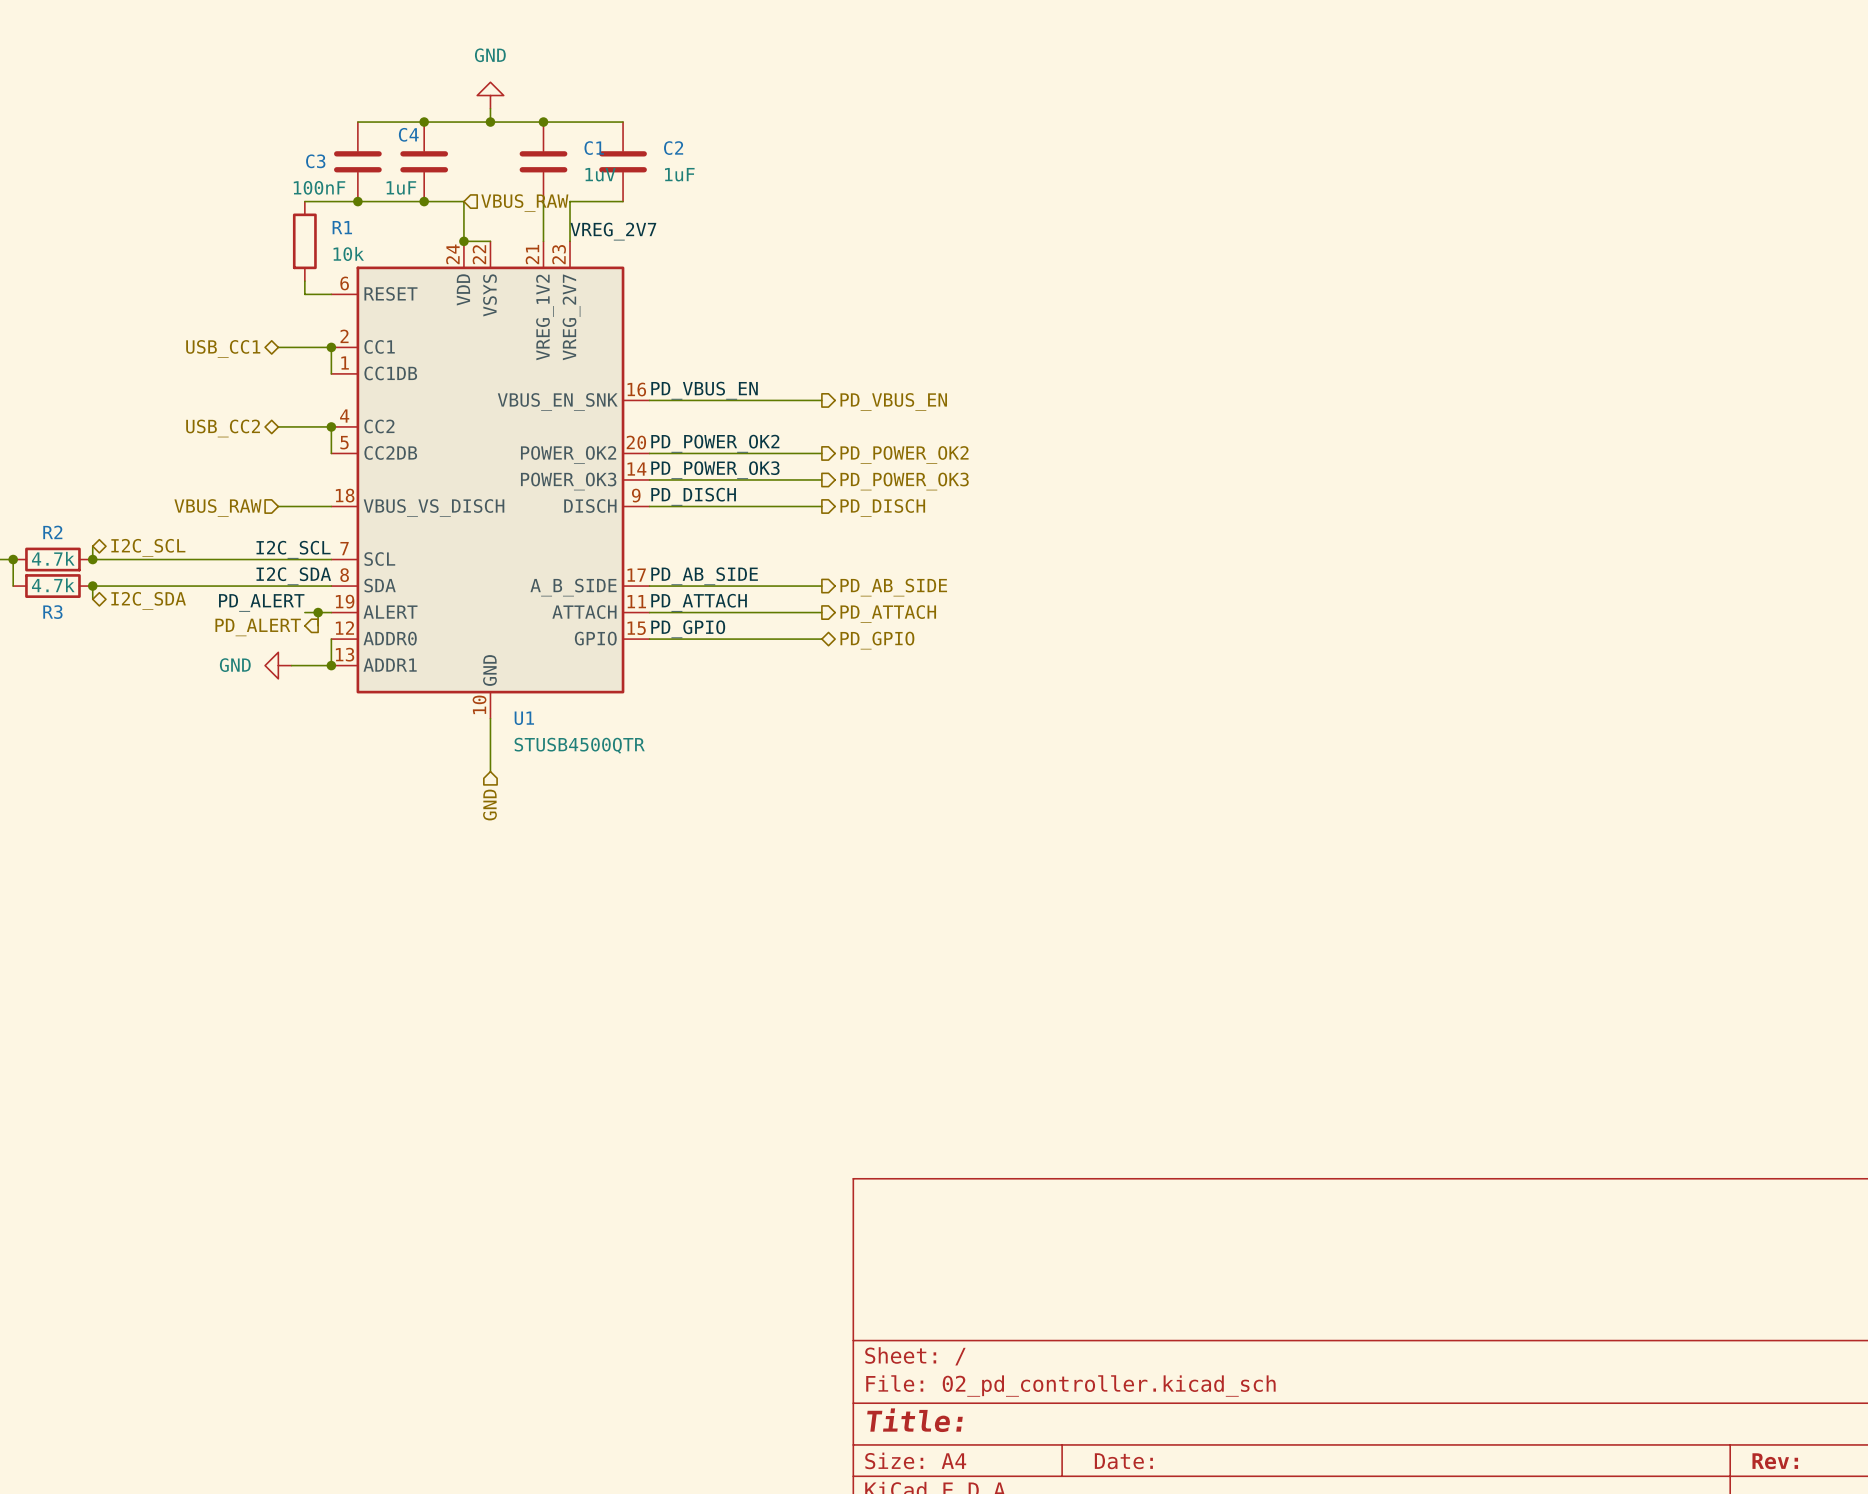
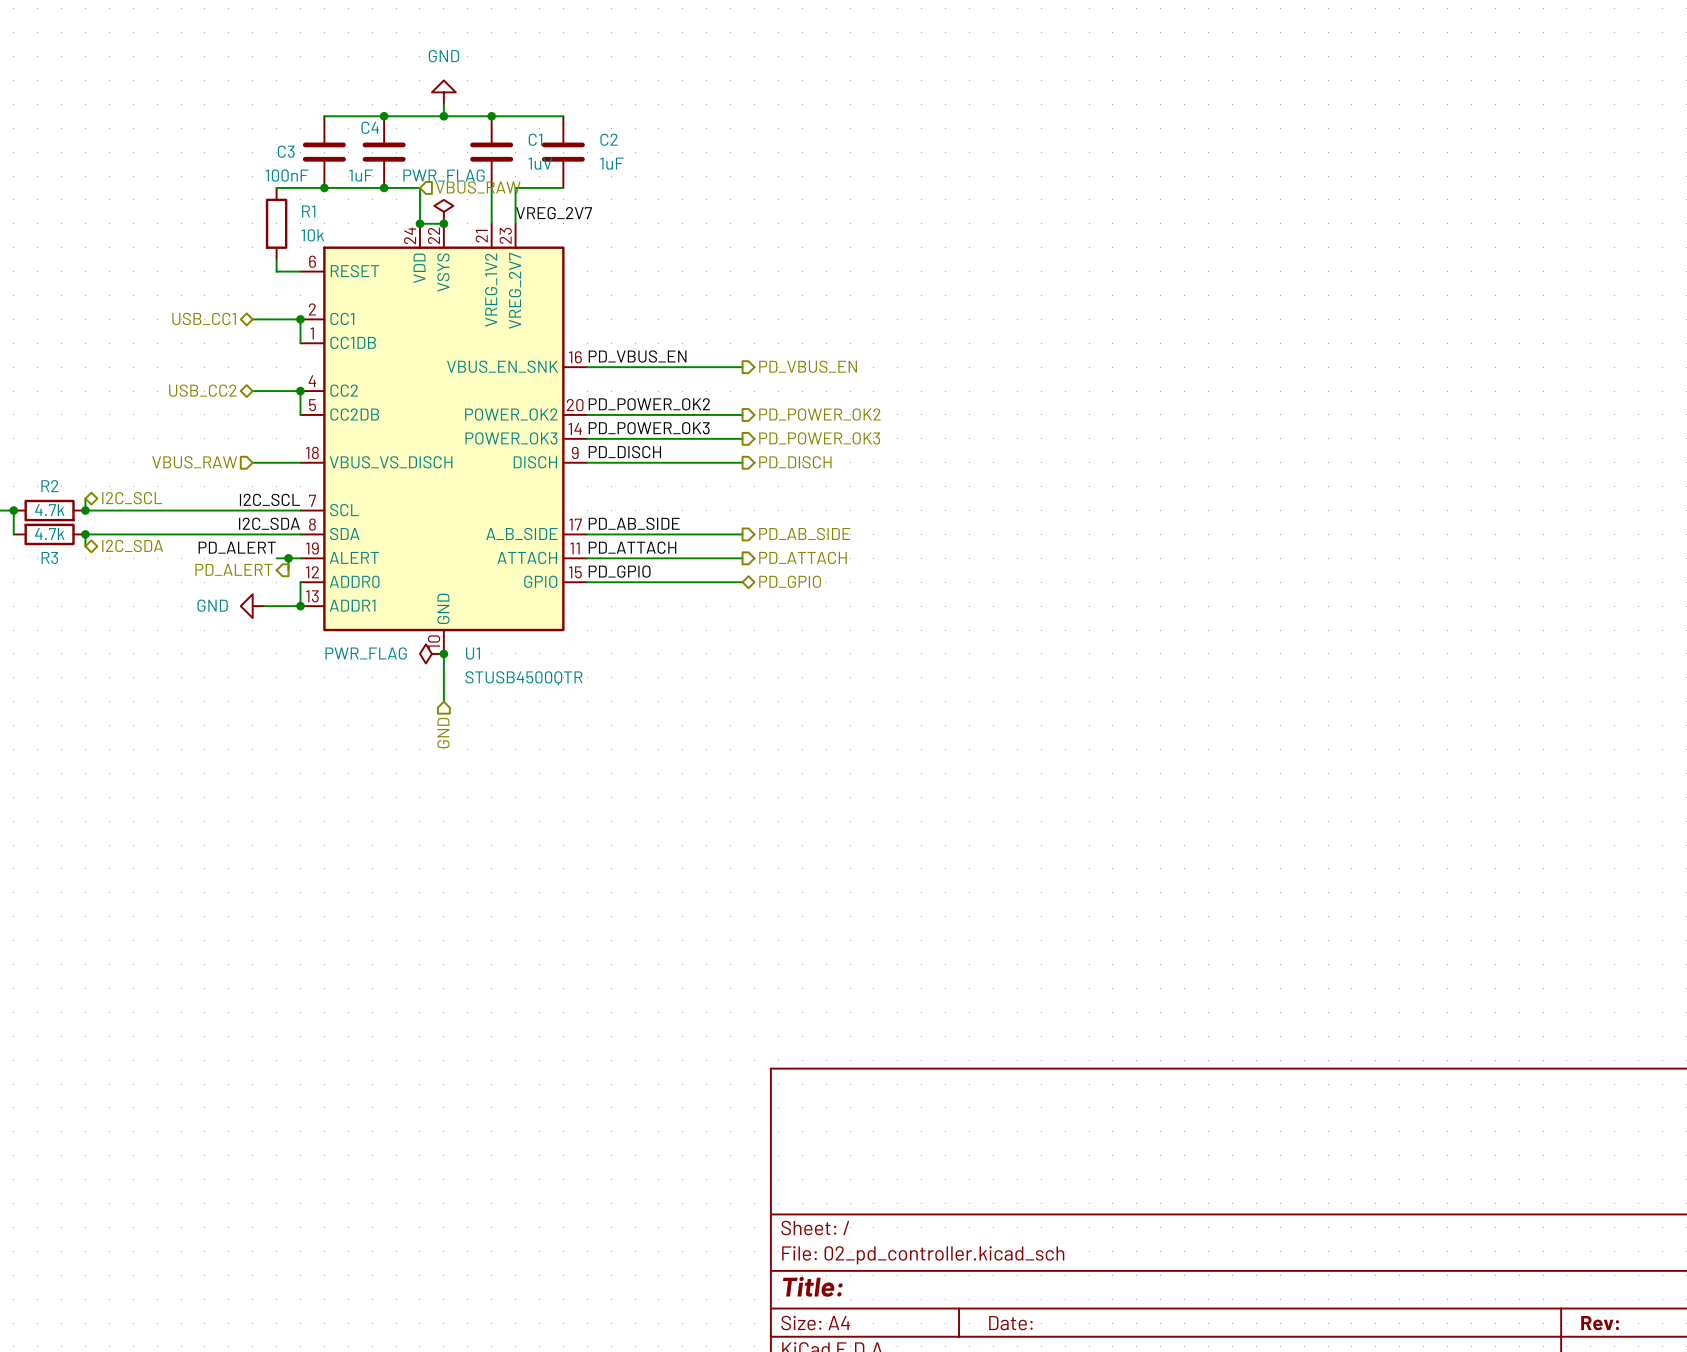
power symbol: none -> PWR_FLAG (443, 211)
junction: none -> (443, 223)
power symbol: none -> PWR_FLAG (431, 653)
junction: none -> (443, 653)

